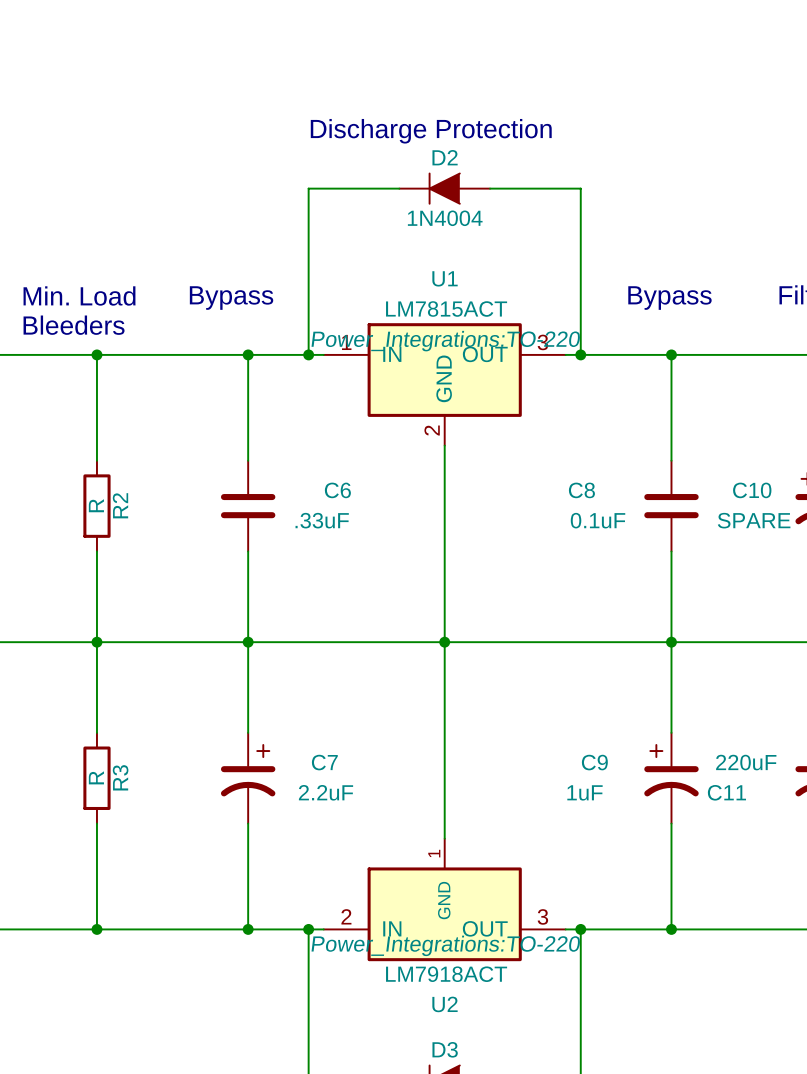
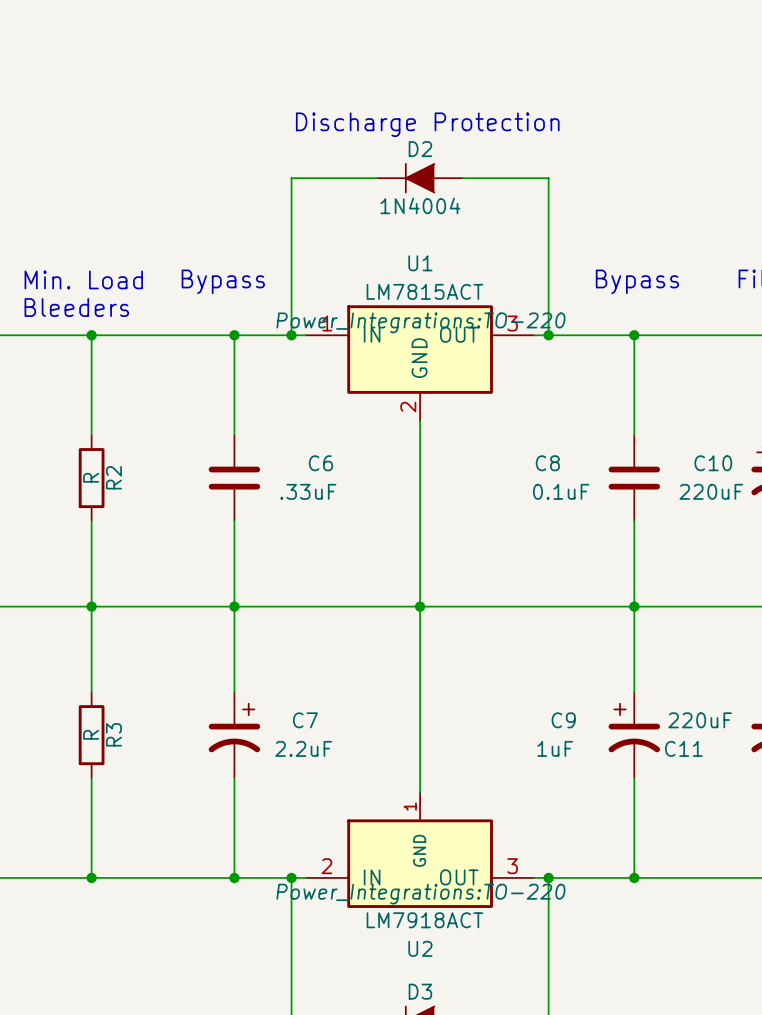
C10 value: SPARE (754, 520) -> 220uF (711, 491)

